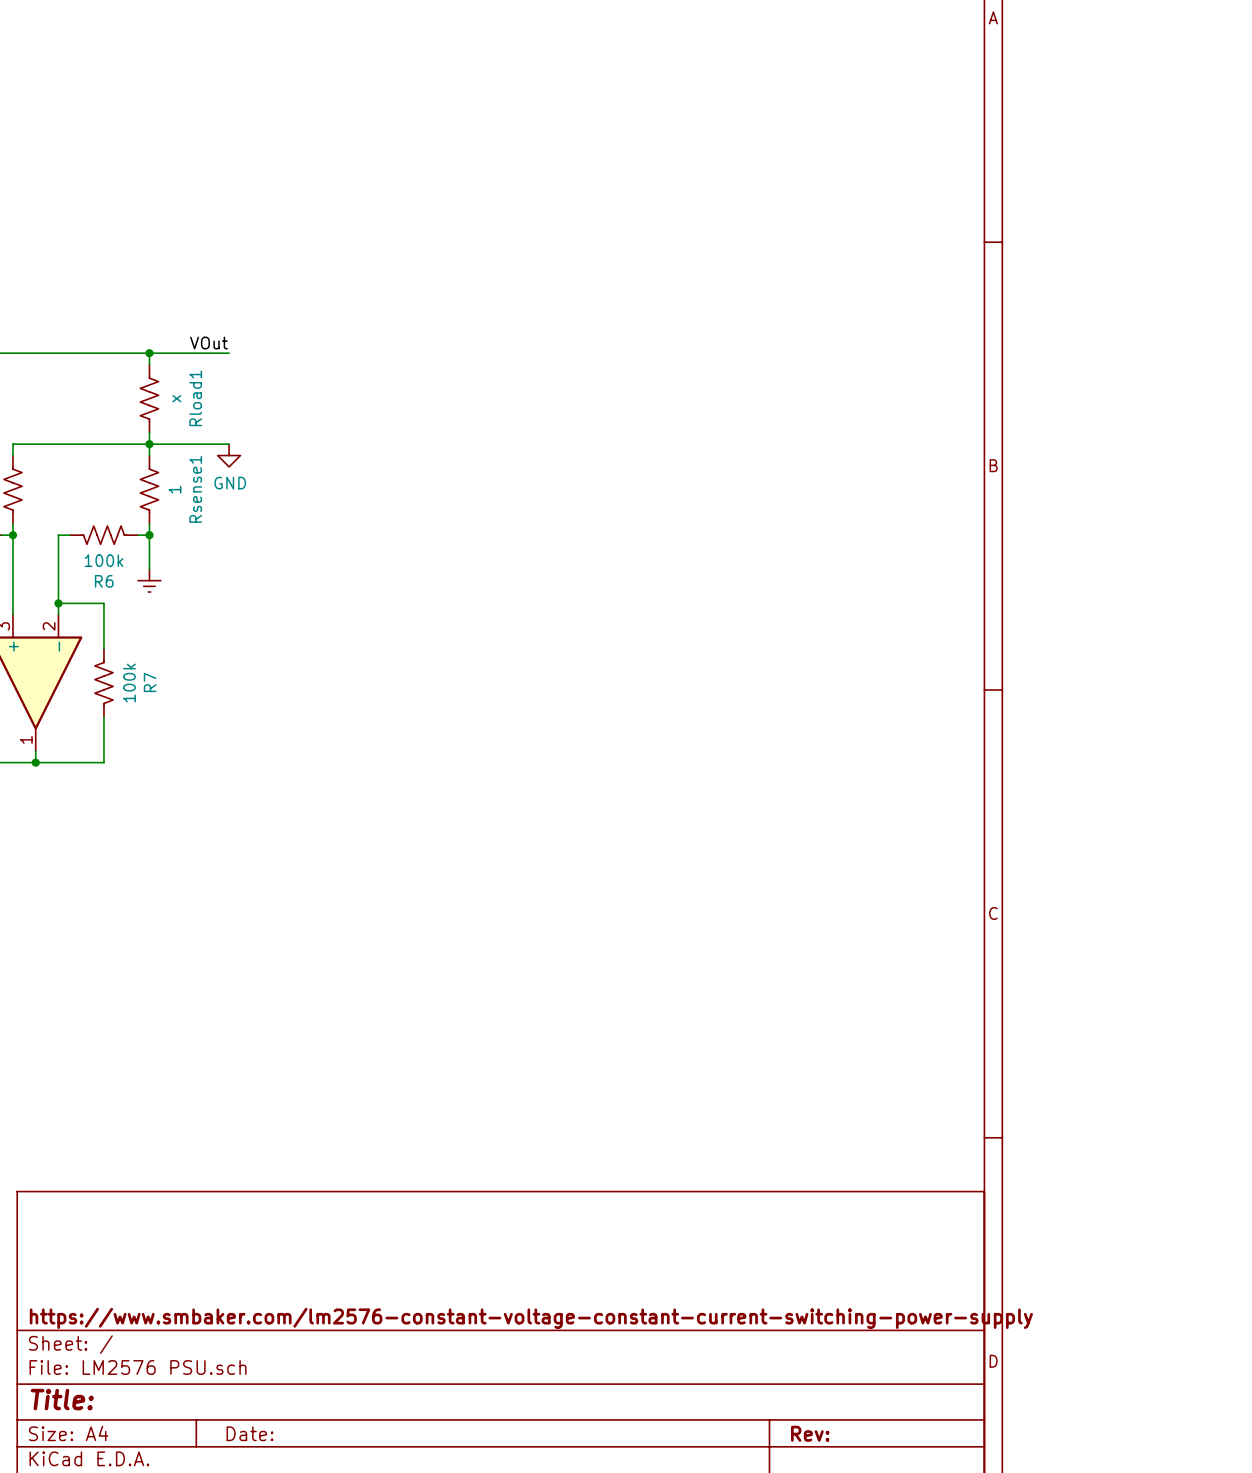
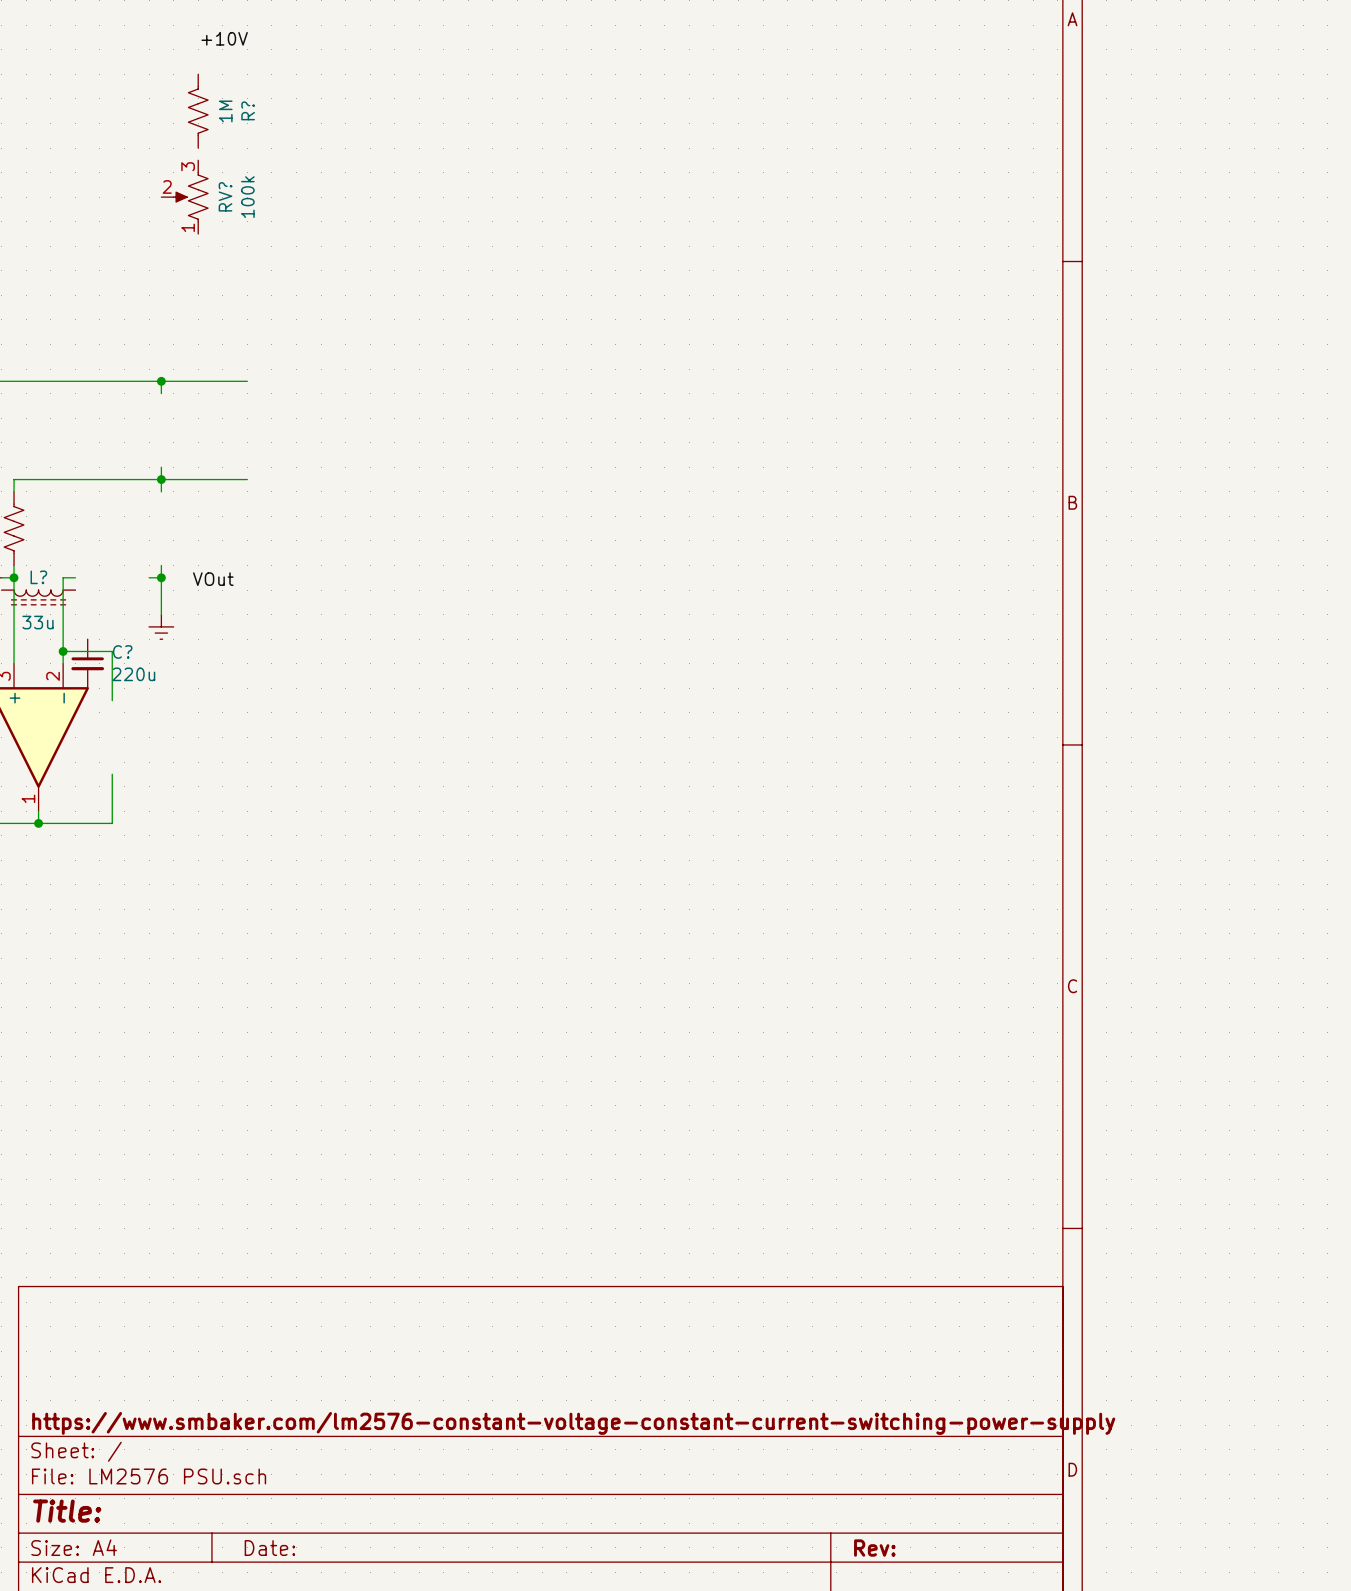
label: none -> +10V (224, 38)
R?: none -> 1M (198, 111)
RV?: none -> 100k (184, 197)
label position: VOut (208, 343) -> VOut (213, 579)
Rload1: x (149, 398) -> none
power symbol: GND (229, 455) -> none
Rsense1: 1 (149, 489) -> none
R6: 100k (103, 535) -> none
L?: none -> 33u (38, 597)
C?: none -> 220u (87, 663)
R7: 100k (103, 683) -> none

